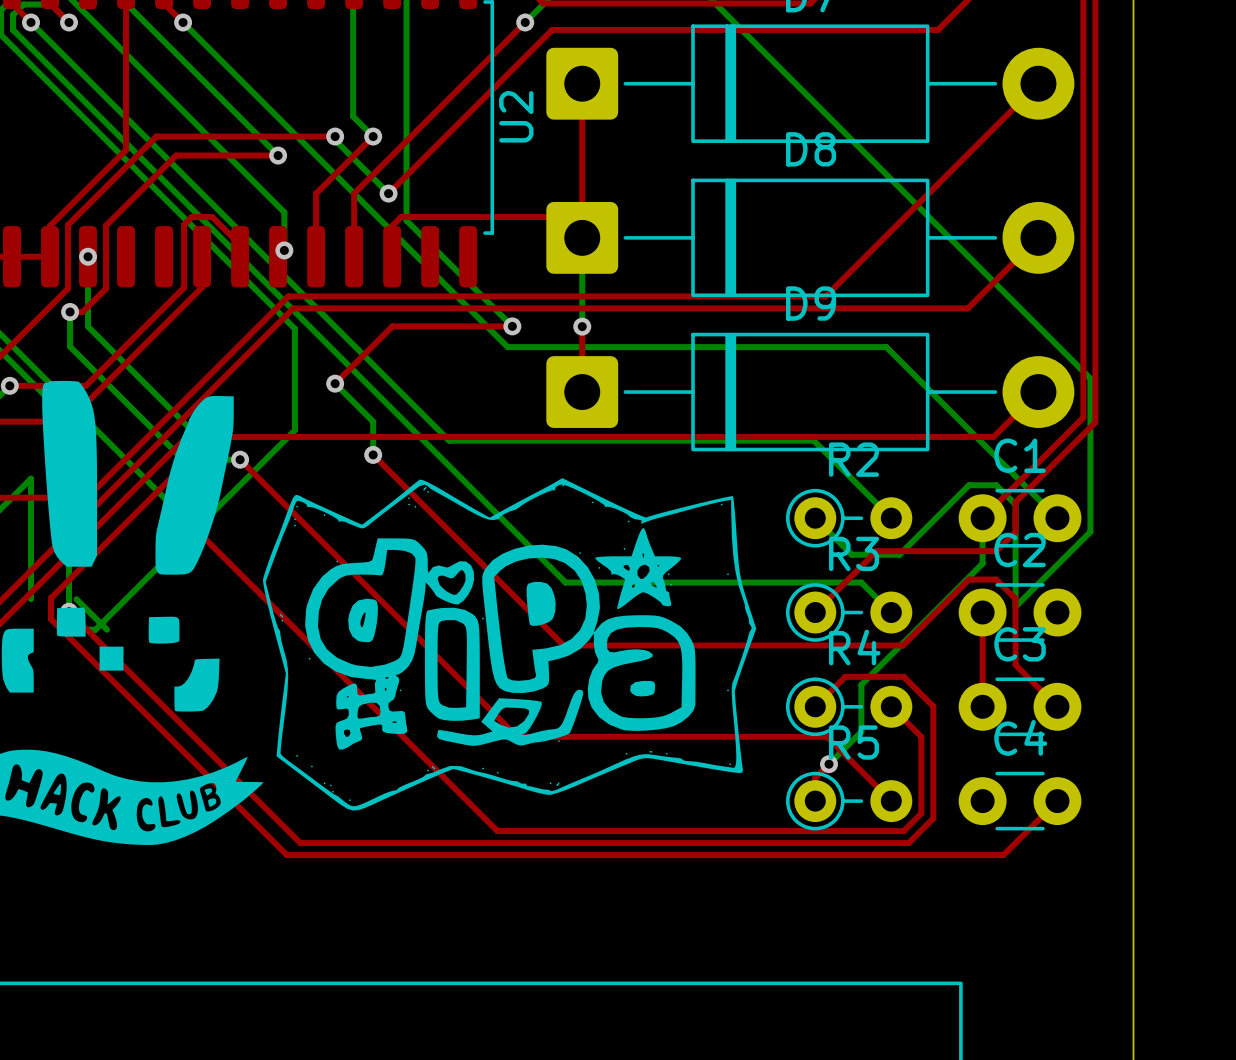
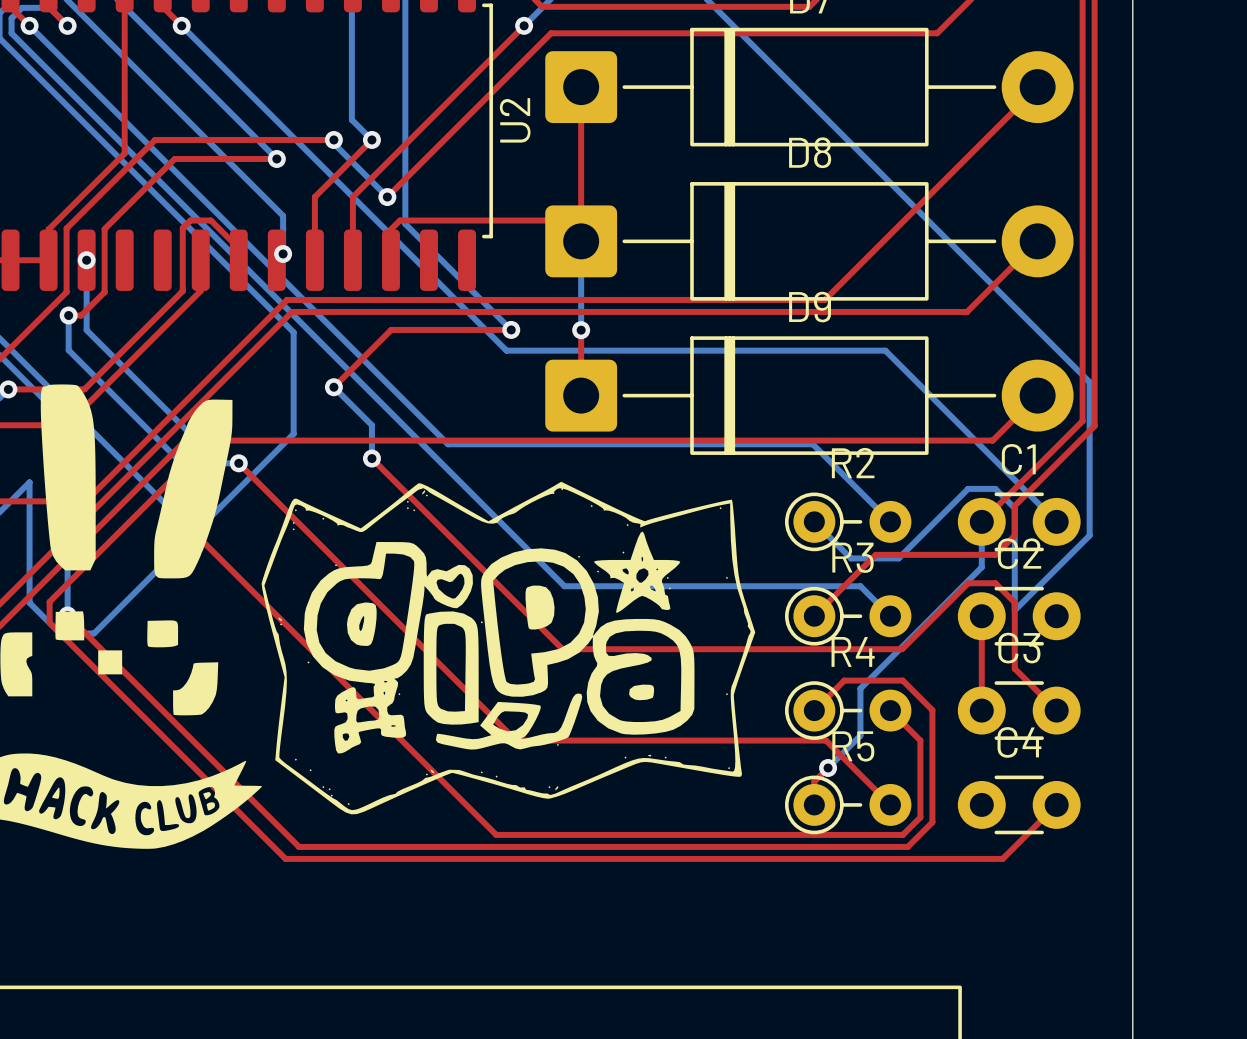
bottom track: (76, 599) (107, 629) -> (29, 602) (60, 633)

